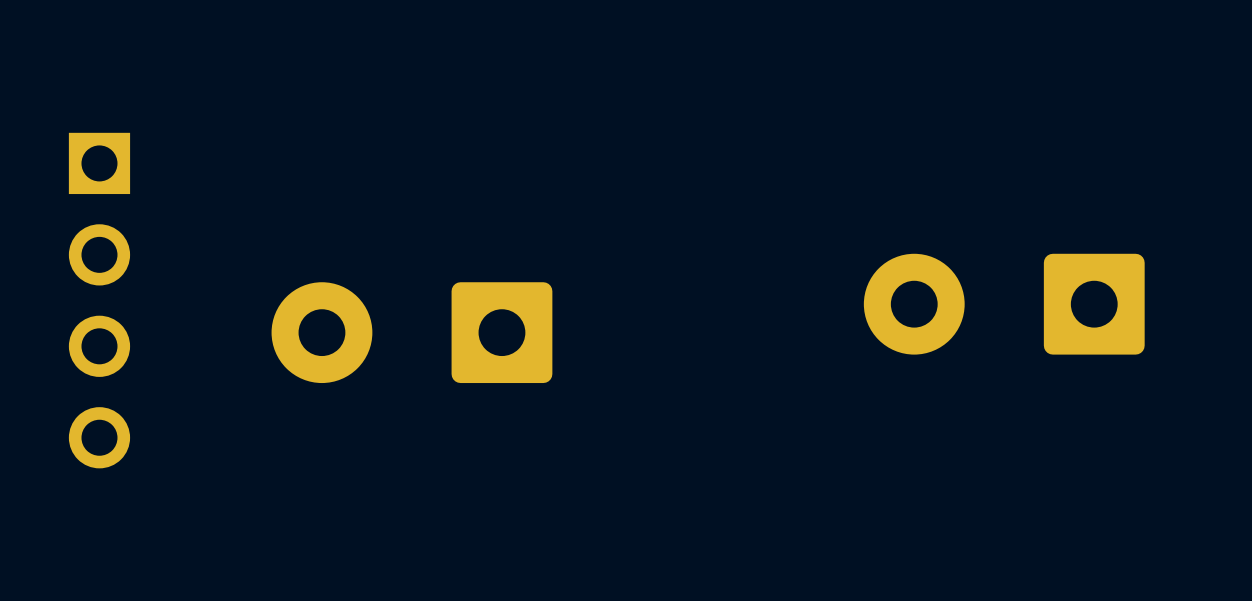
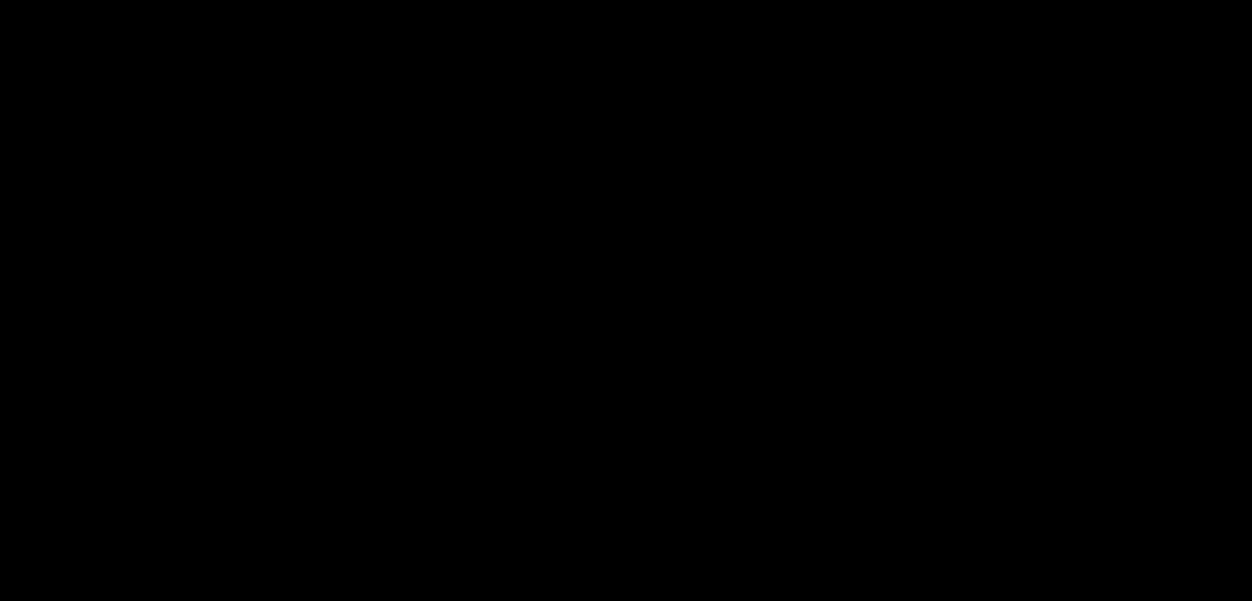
part: (99, 300) -> none
part: (1004, 304) -> none
part: (411, 332) -> none

